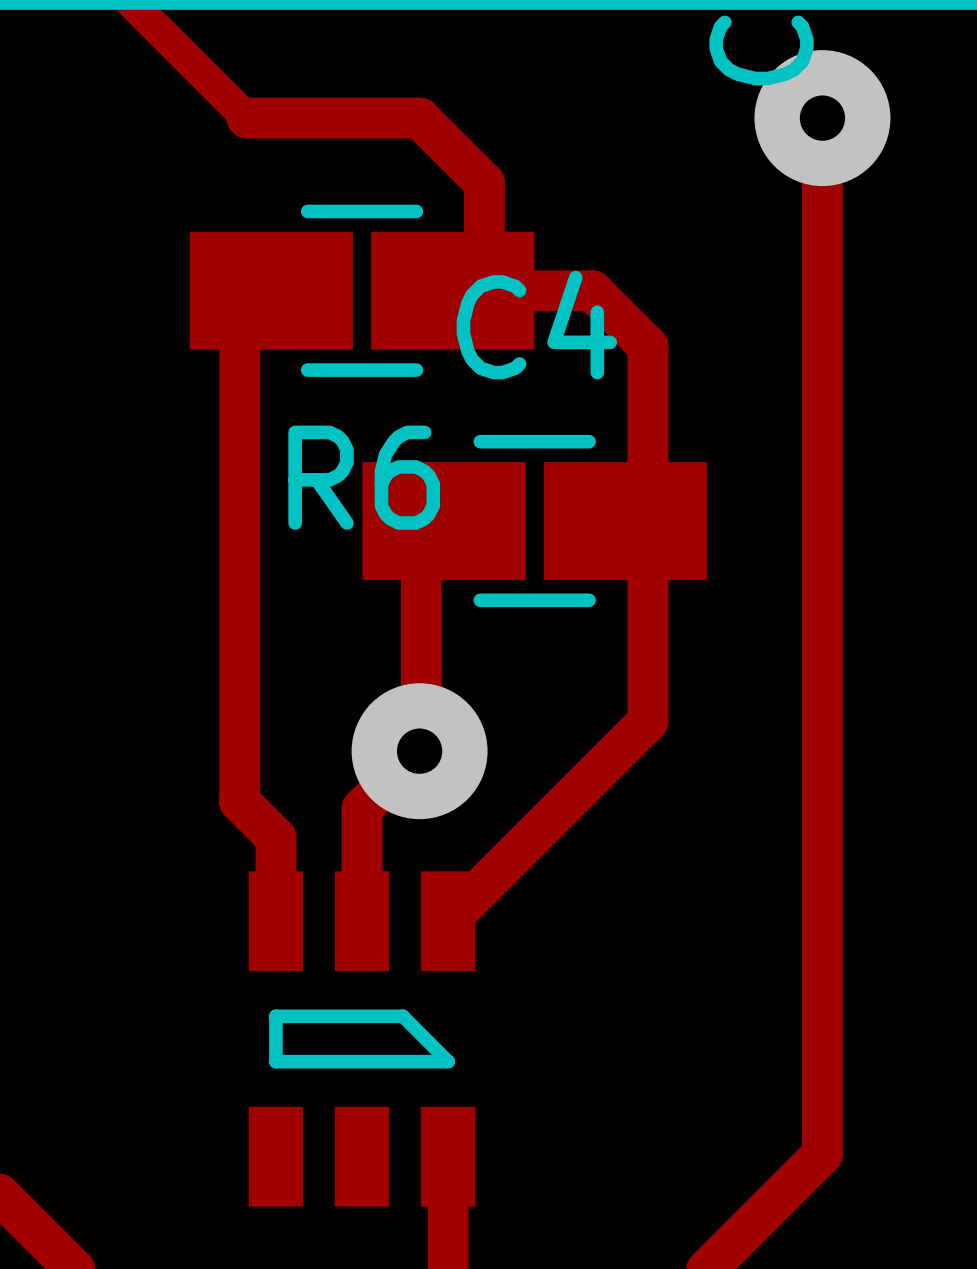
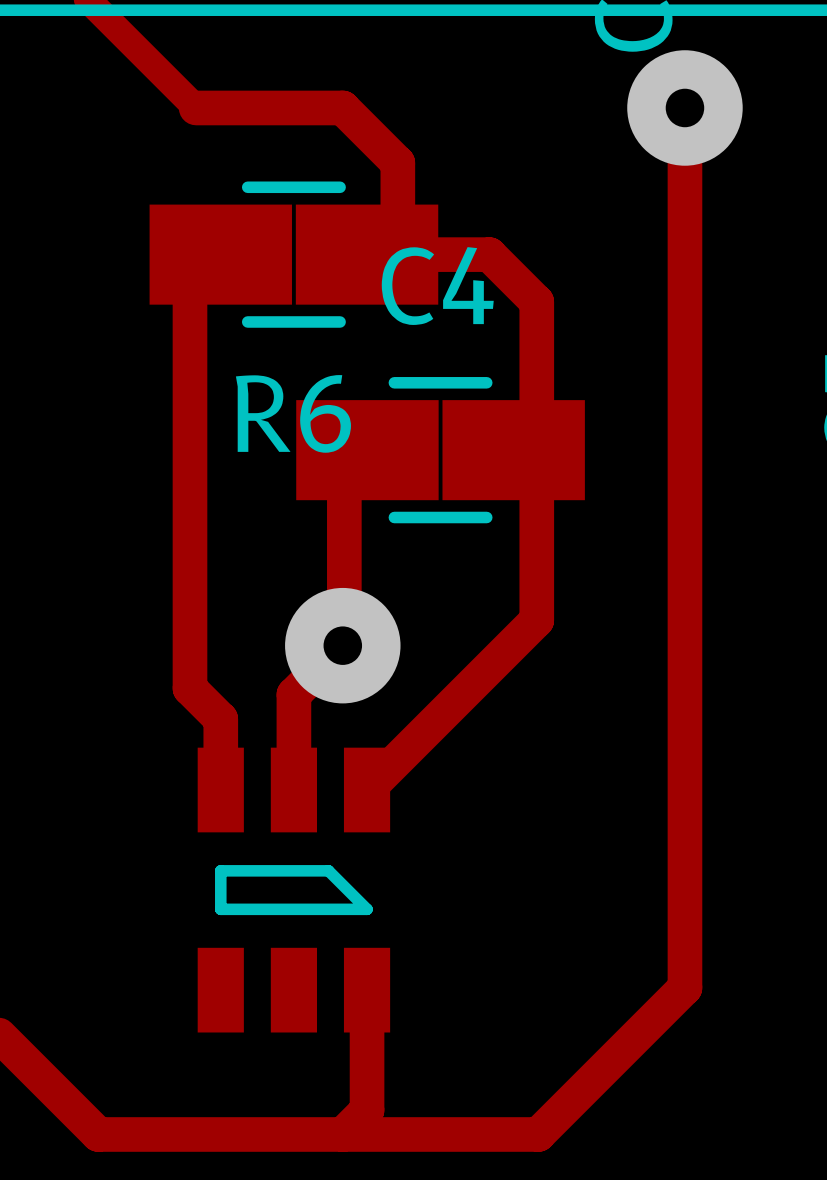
R6 footprint: [189, 204, 535, 377] -> [149, 181, 439, 328]
C4 footprint: [362, 434, 707, 608] -> [296, 377, 585, 524]

